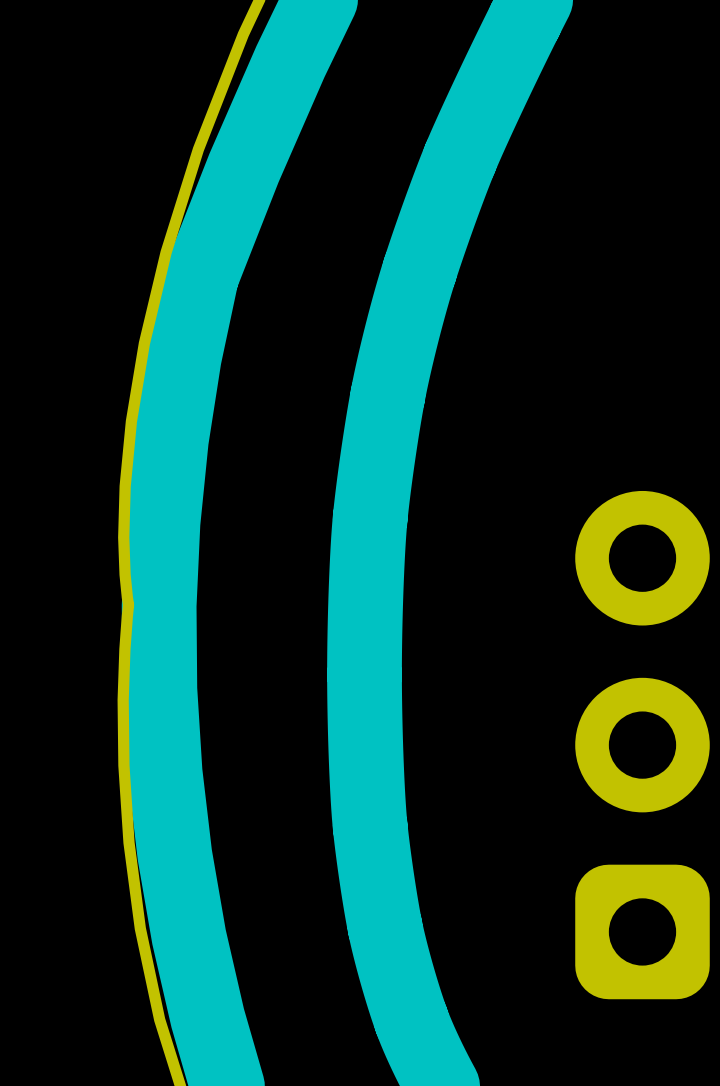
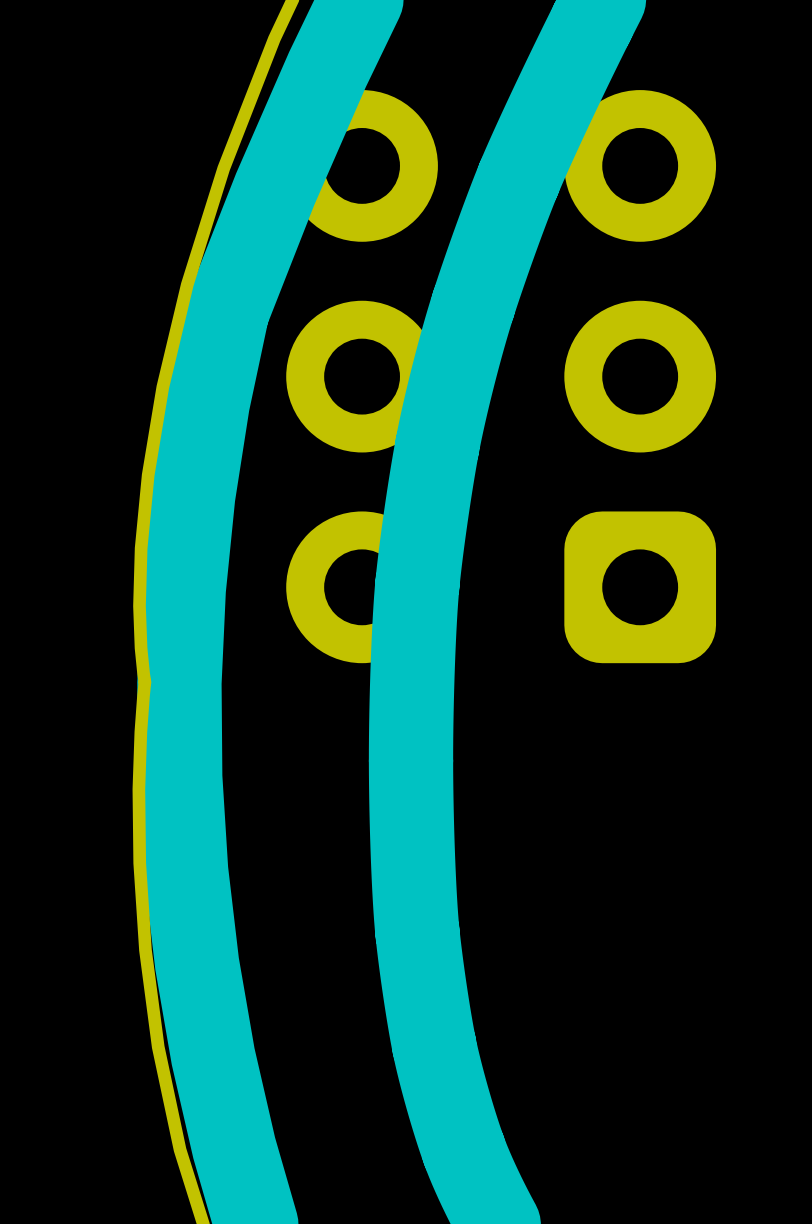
part: none -> (501, 376)
part: (642, 745) -> none

